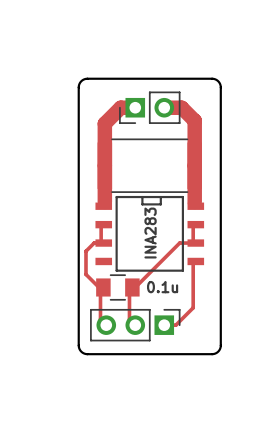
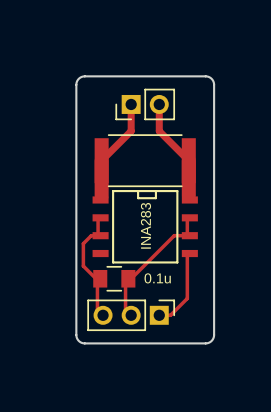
track: (135, 107) (120, 107) (104, 123) (104, 165) -> (131, 104) (131, 131) (101, 160)
track: (164, 107) (181, 107) (194, 120) (194, 165) -> (159, 104) (159, 131) (188, 160)

